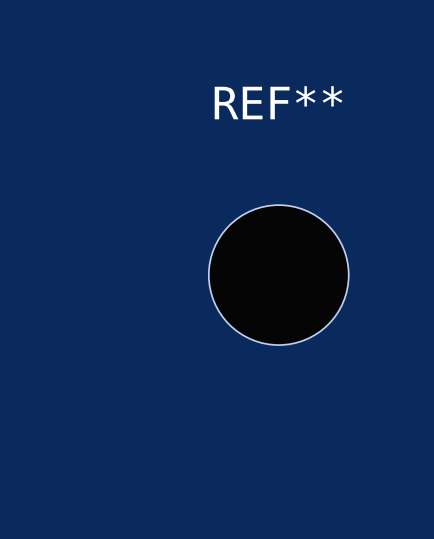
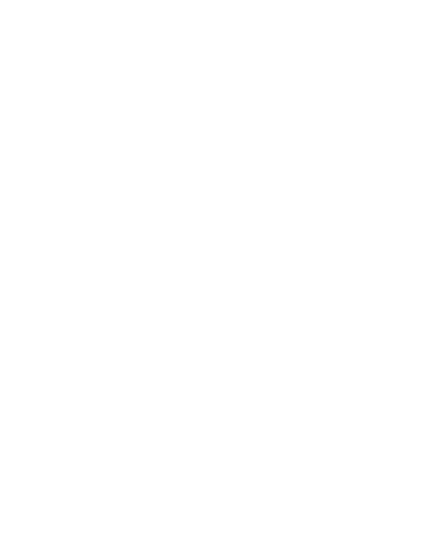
REF**: (278, 275) -> none

